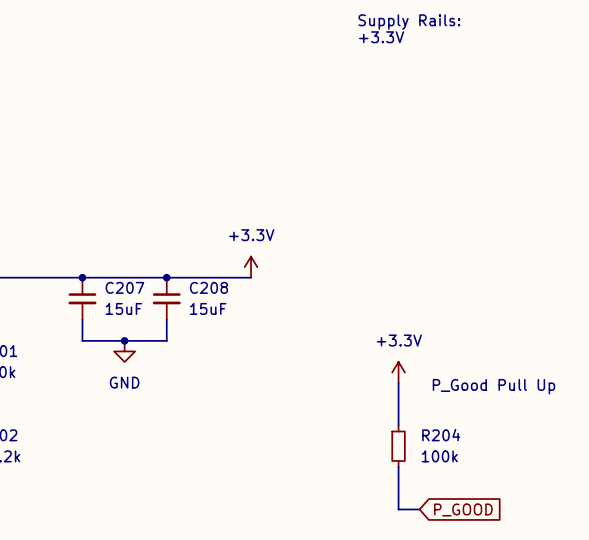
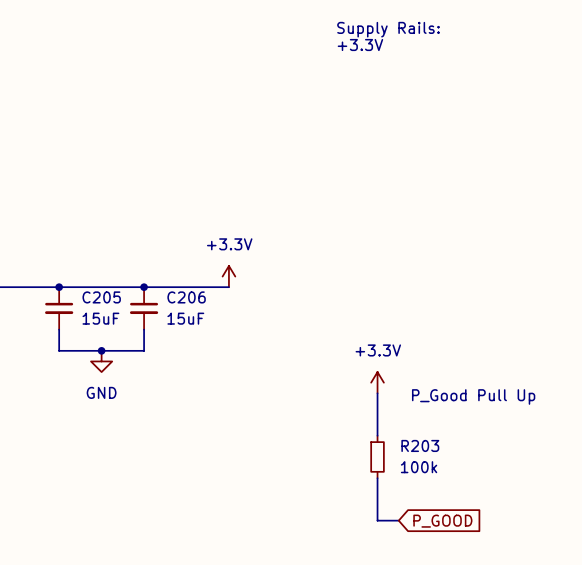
C207 name: C207 (124, 287) -> C205 (101, 297)
C208 name: C208 (208, 287) -> C206 (186, 297)
R204 name: R204 (441, 435) -> R203 (420, 445)

